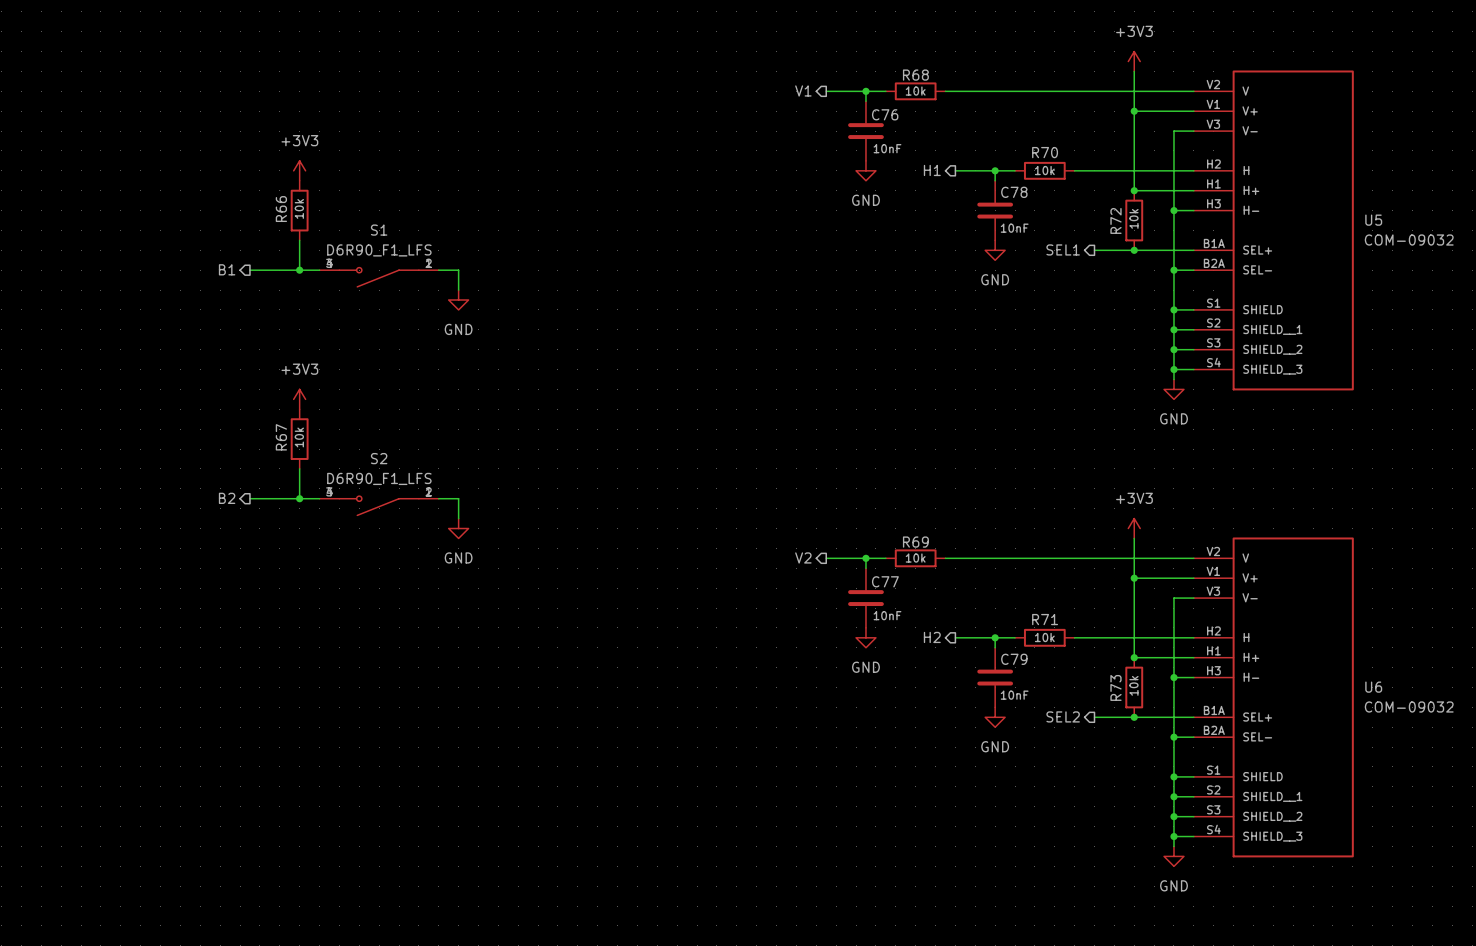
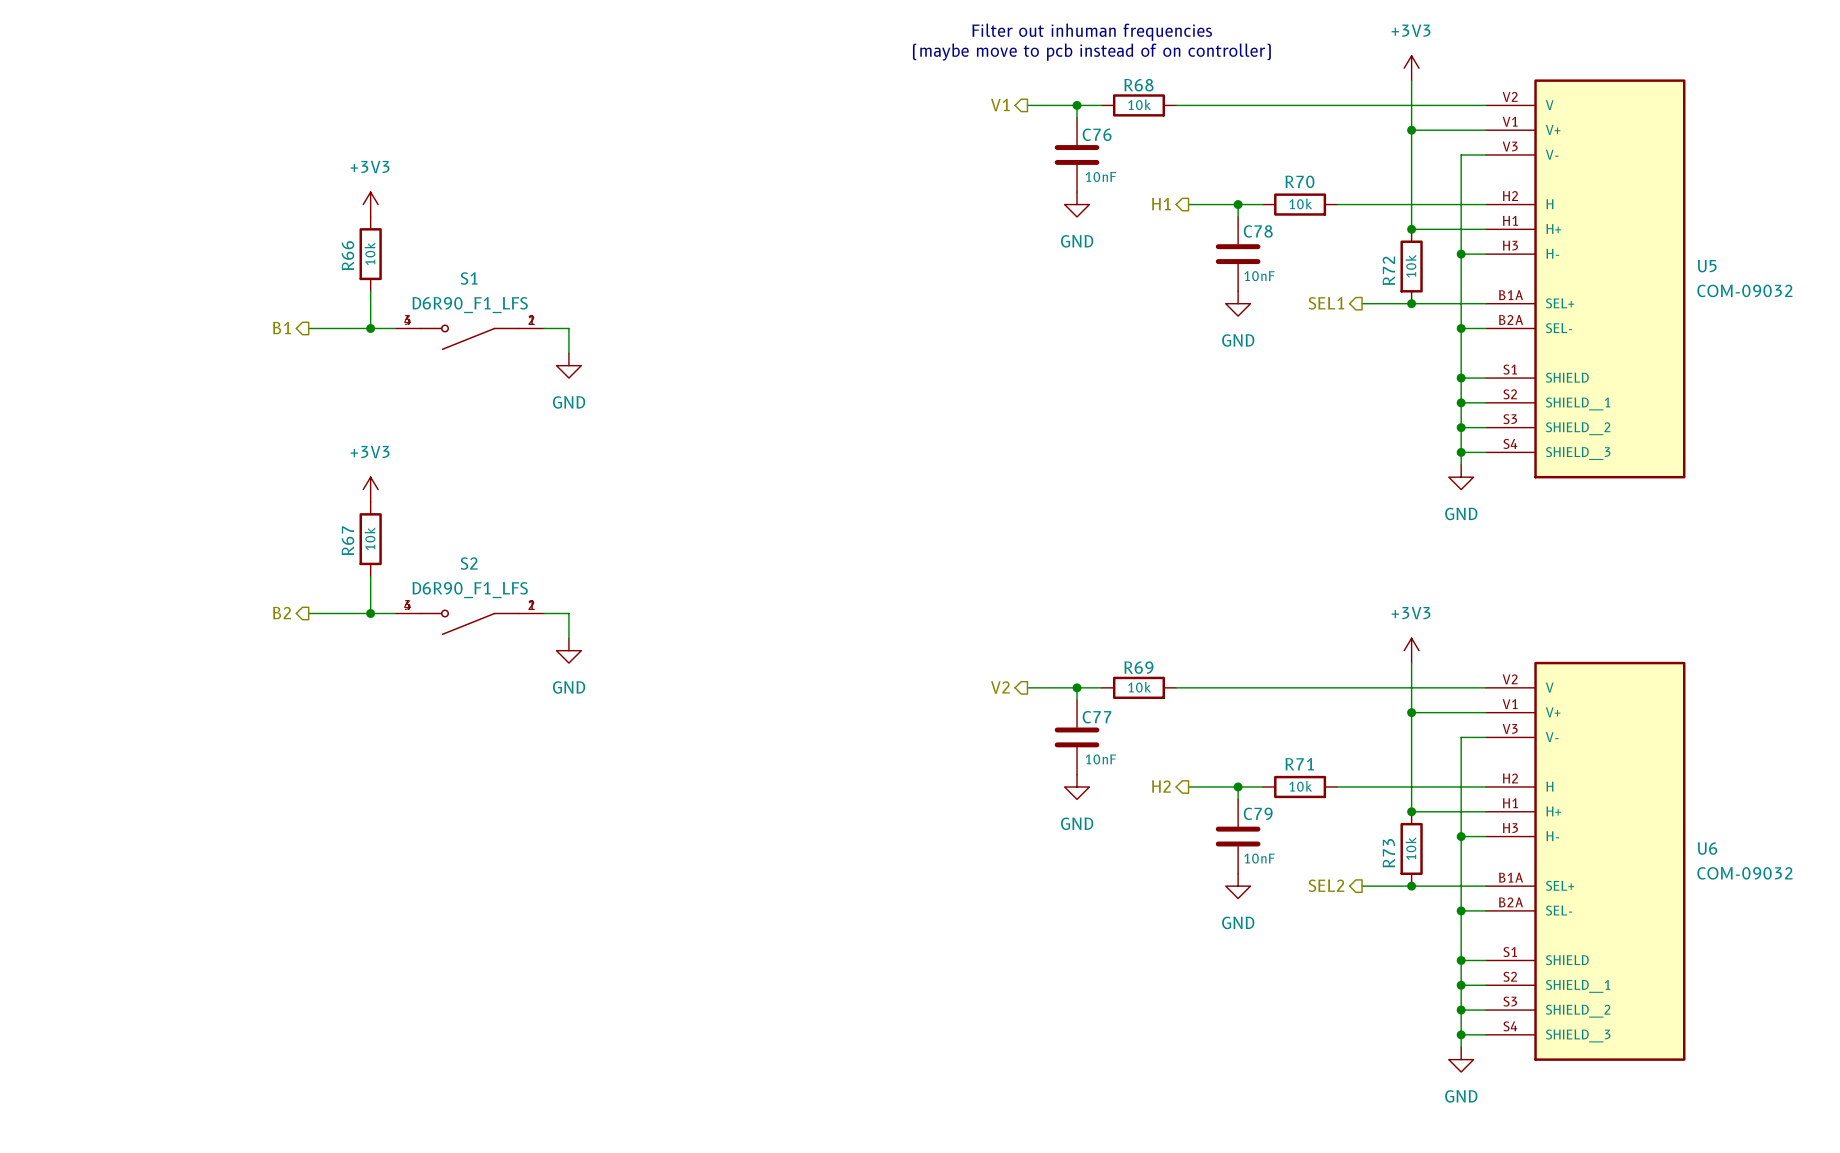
text: none -> Filter out inhuman frequencies (1092, 32)
text: none -> (maybe move to pcb instead of on controller) (1091, 52)

